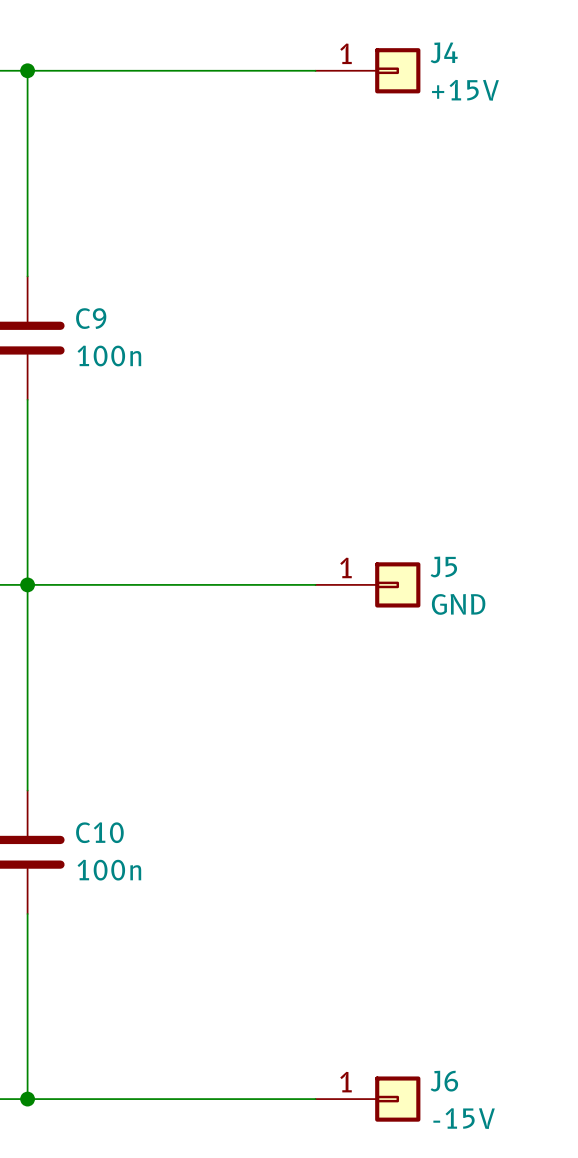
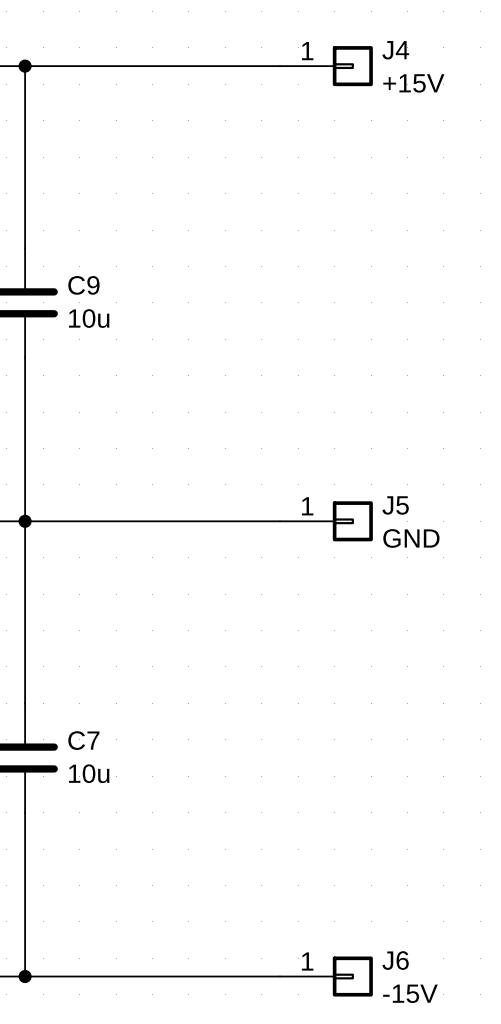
C9 value: 100n (109, 355) -> 10u (89, 318)
C10 name: C10 (99, 832) -> C7 (83, 740)
C10 value: 100n (109, 870) -> 10u (89, 773)

